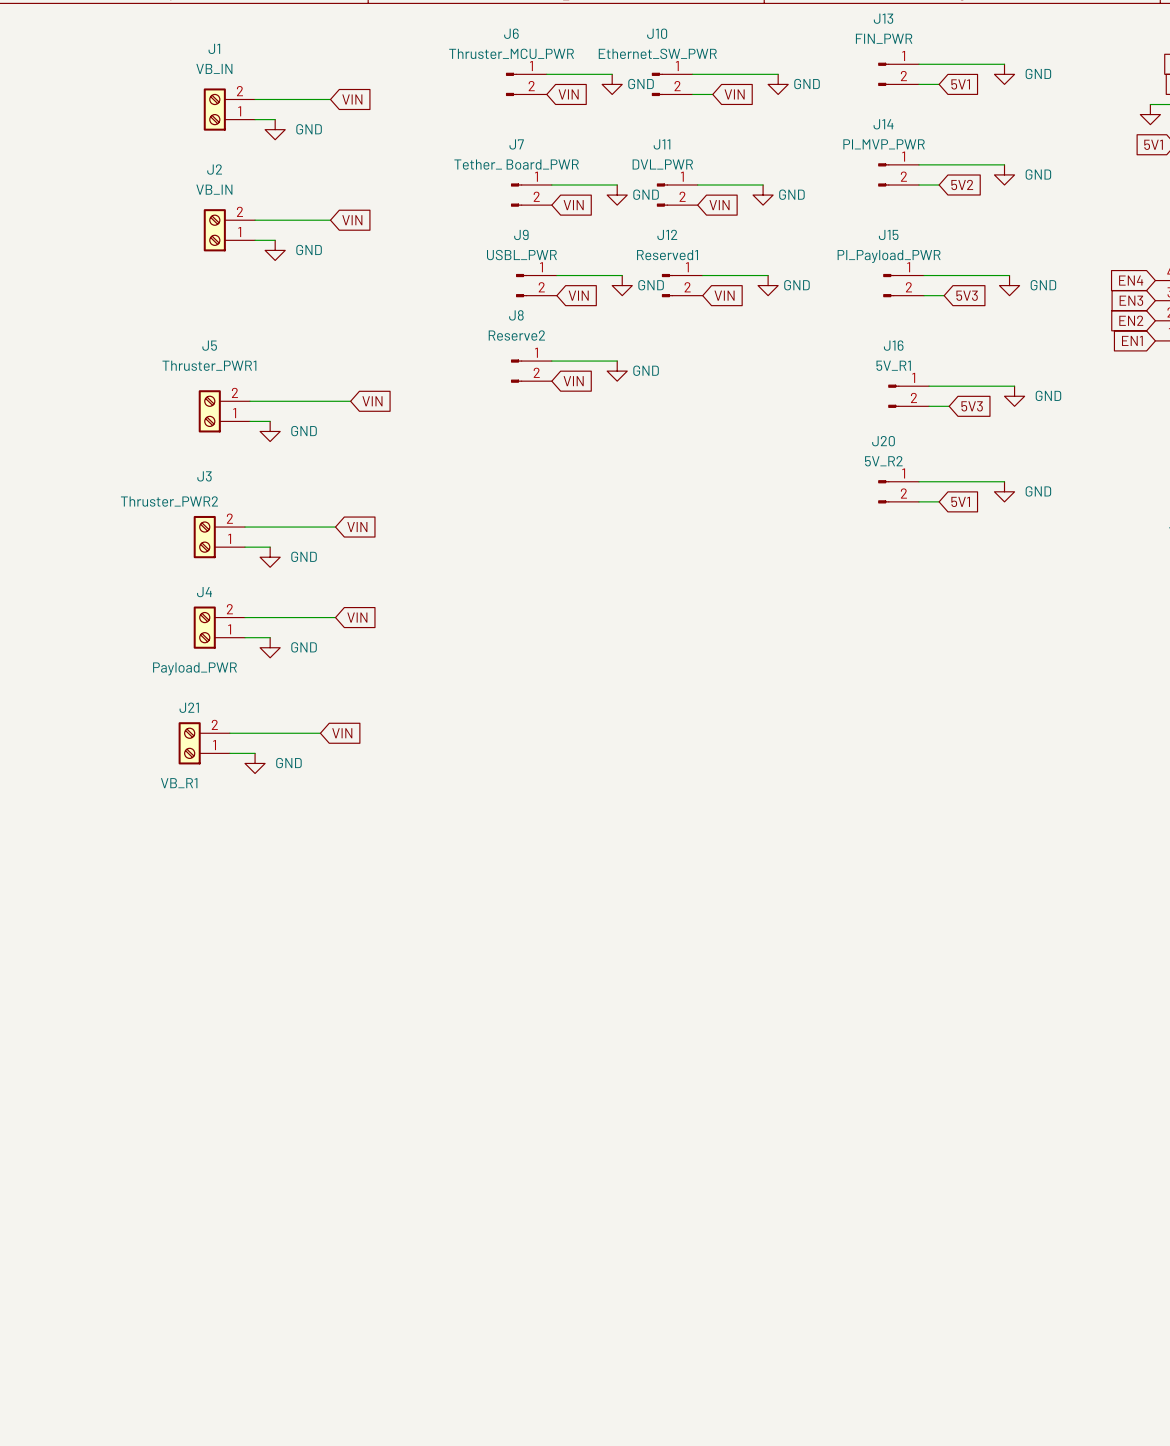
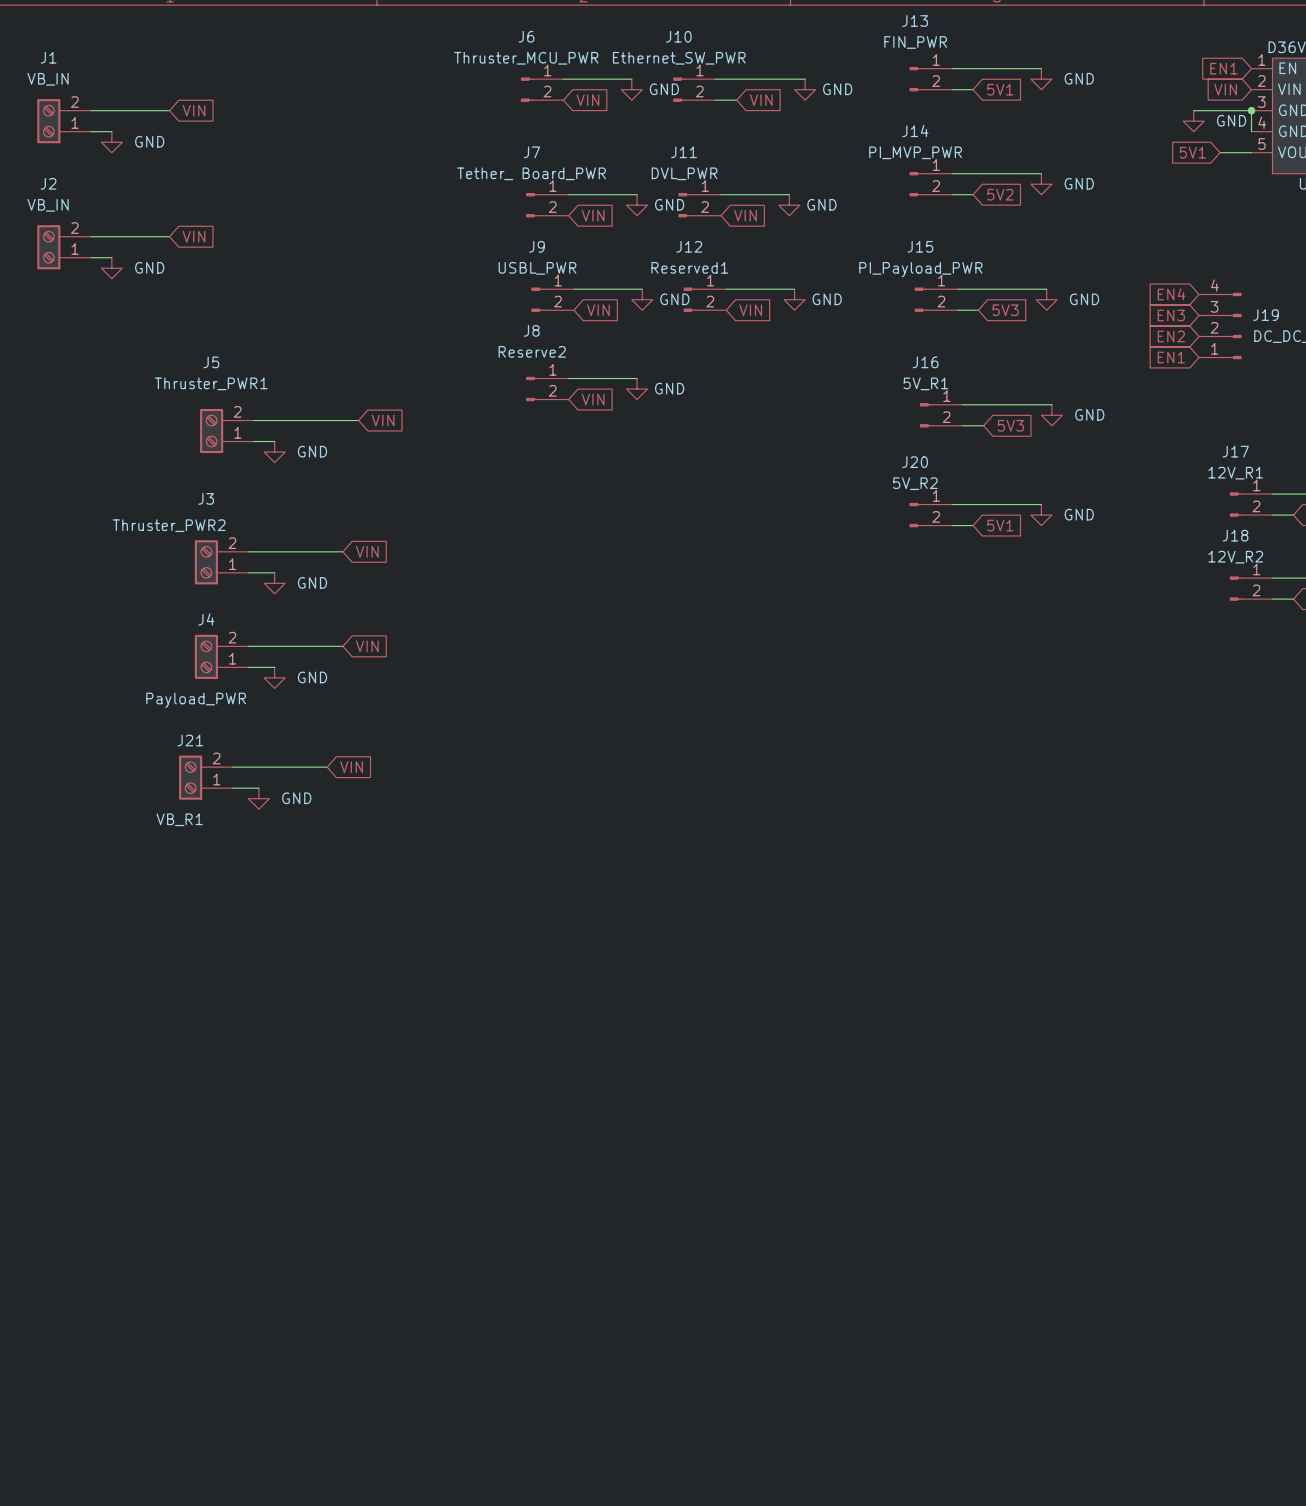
wire: (255, 99) (330, 99) -> (90, 110) (169, 110)
global label: VIN (352, 99) -> none
global label: none -> VIN (194, 110)
J1 position: (229, 109) -> (64, 121)
wire: (255, 119) (275, 119) -> (90, 131) (111, 131)
power symbol: GND (275, 129) -> none
power symbol: none -> GND (111, 142)
wire: (255, 220) (330, 220) -> (90, 236) (169, 236)
global label: VIN (352, 220) -> none
global label: none -> VIN (194, 236)
J2 position: (229, 230) -> (64, 247)
wire: (255, 240) (275, 240) -> (90, 257) (111, 257)
power symbol: GND (275, 250) -> none
power symbol: none -> GND (111, 268)

